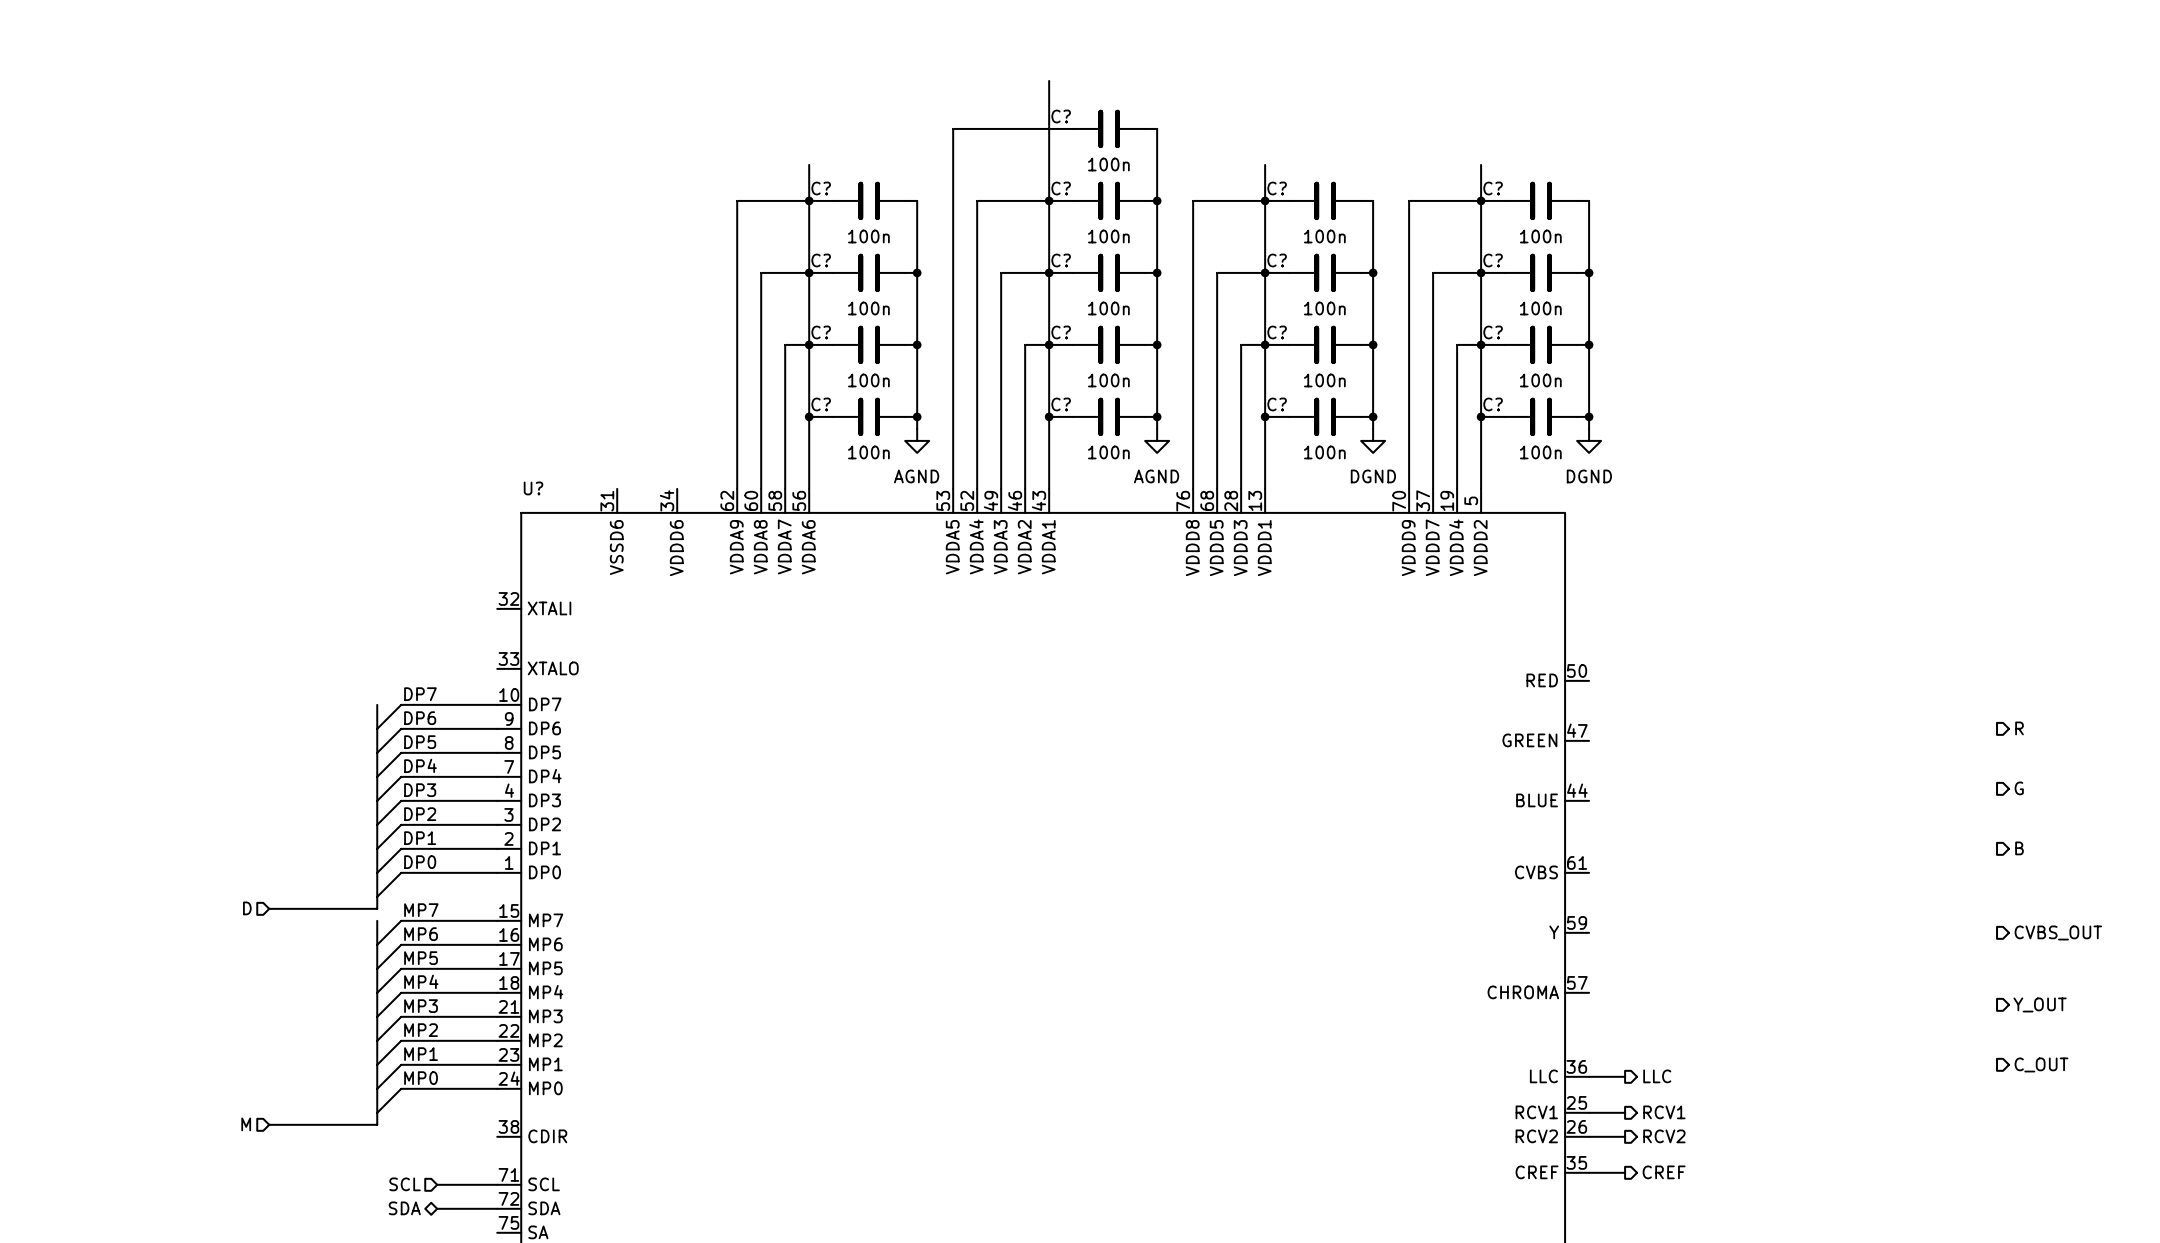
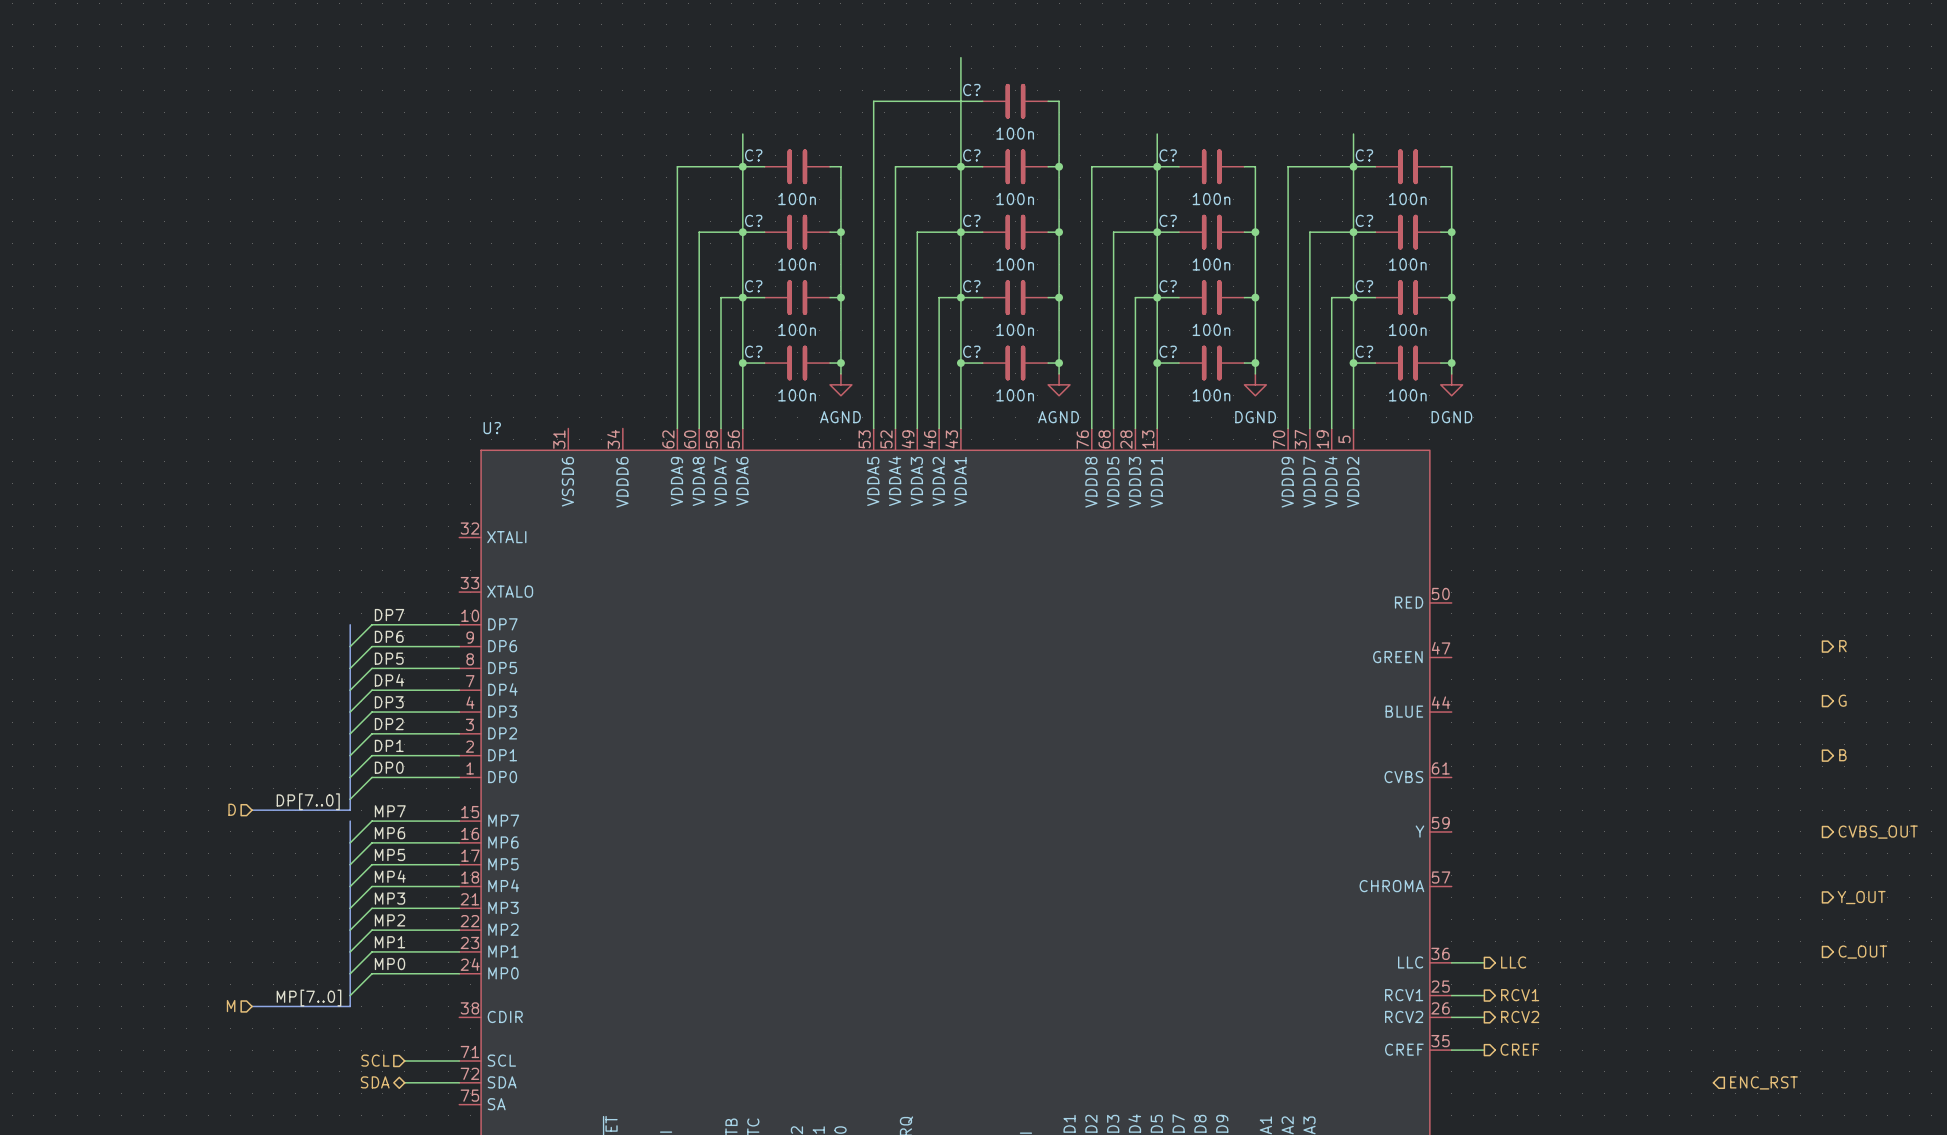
label: none -> DP[7..0] (308, 801)
label: none -> MP[7..0] (309, 998)
hierarchical label: none -> ENC_RST (1763, 1082)

